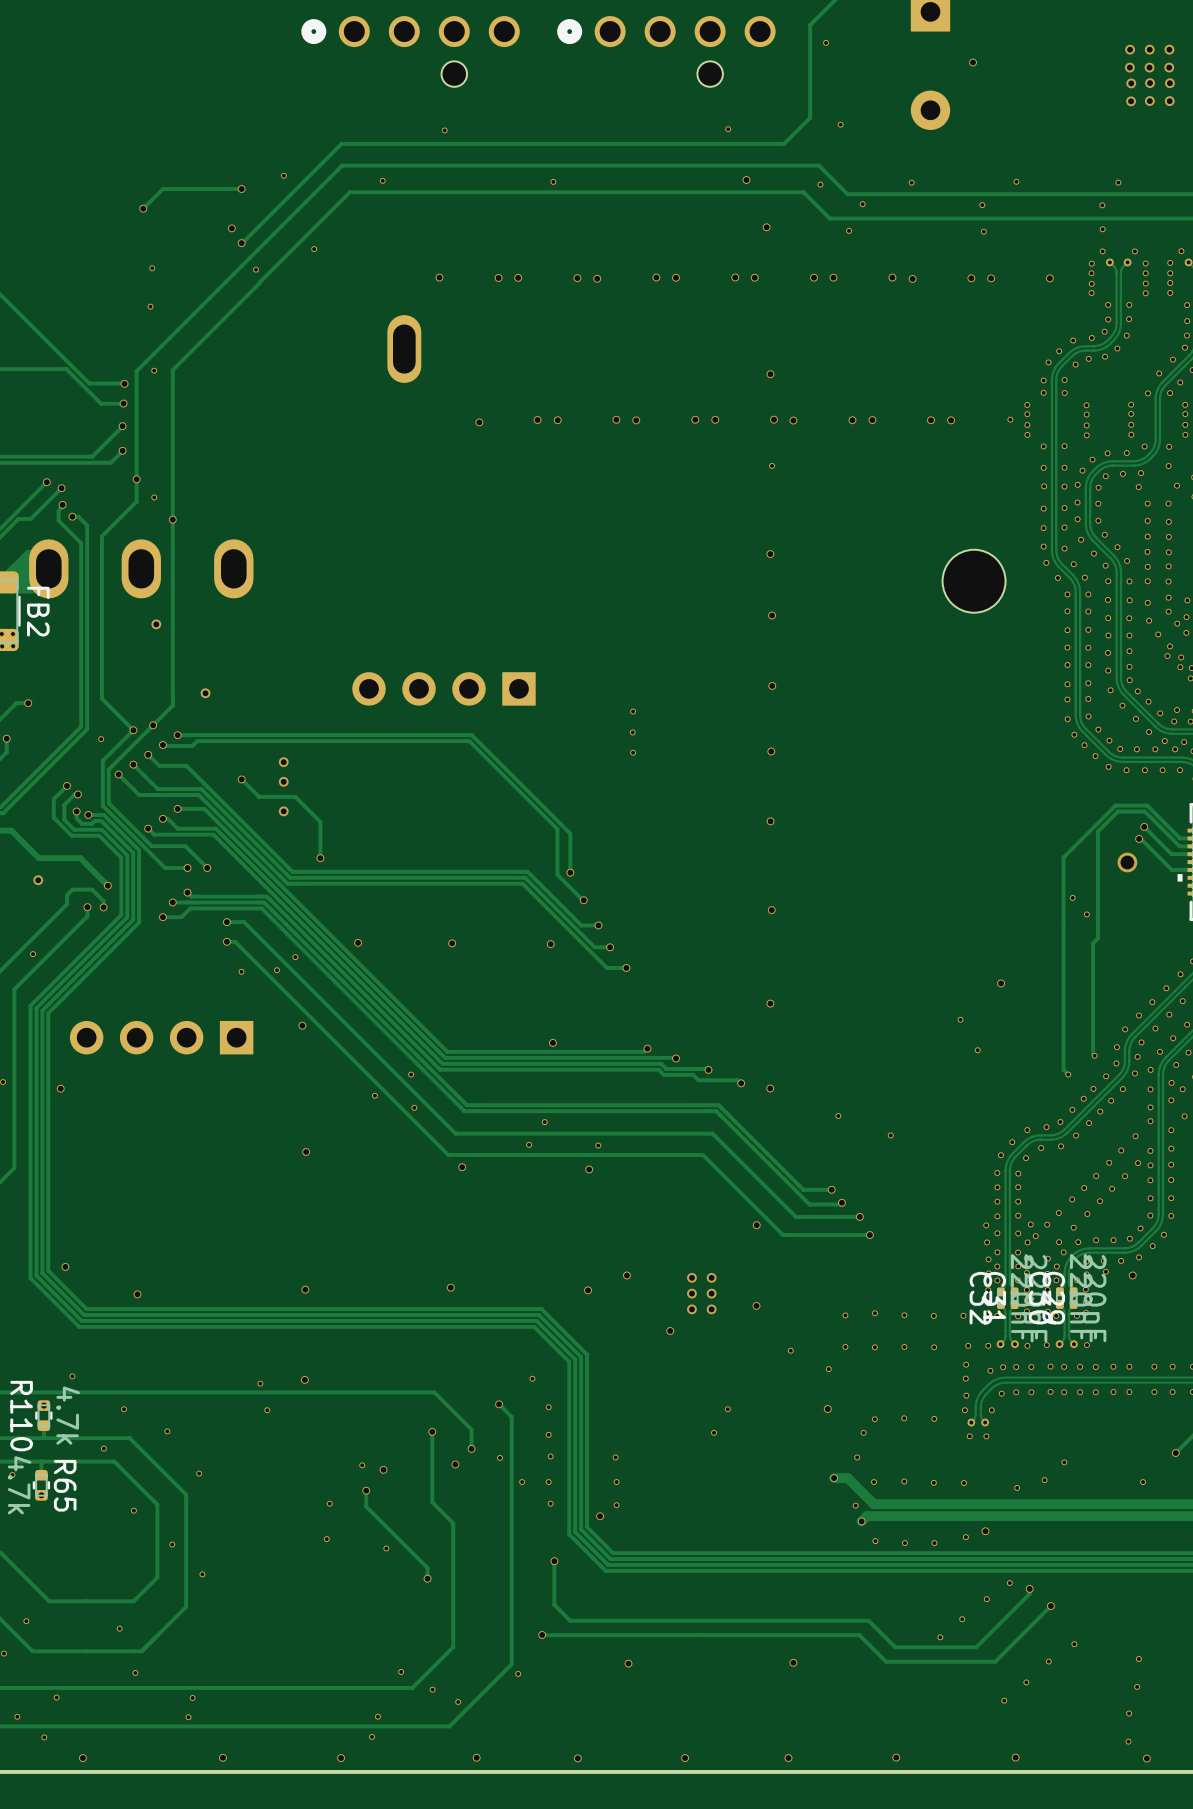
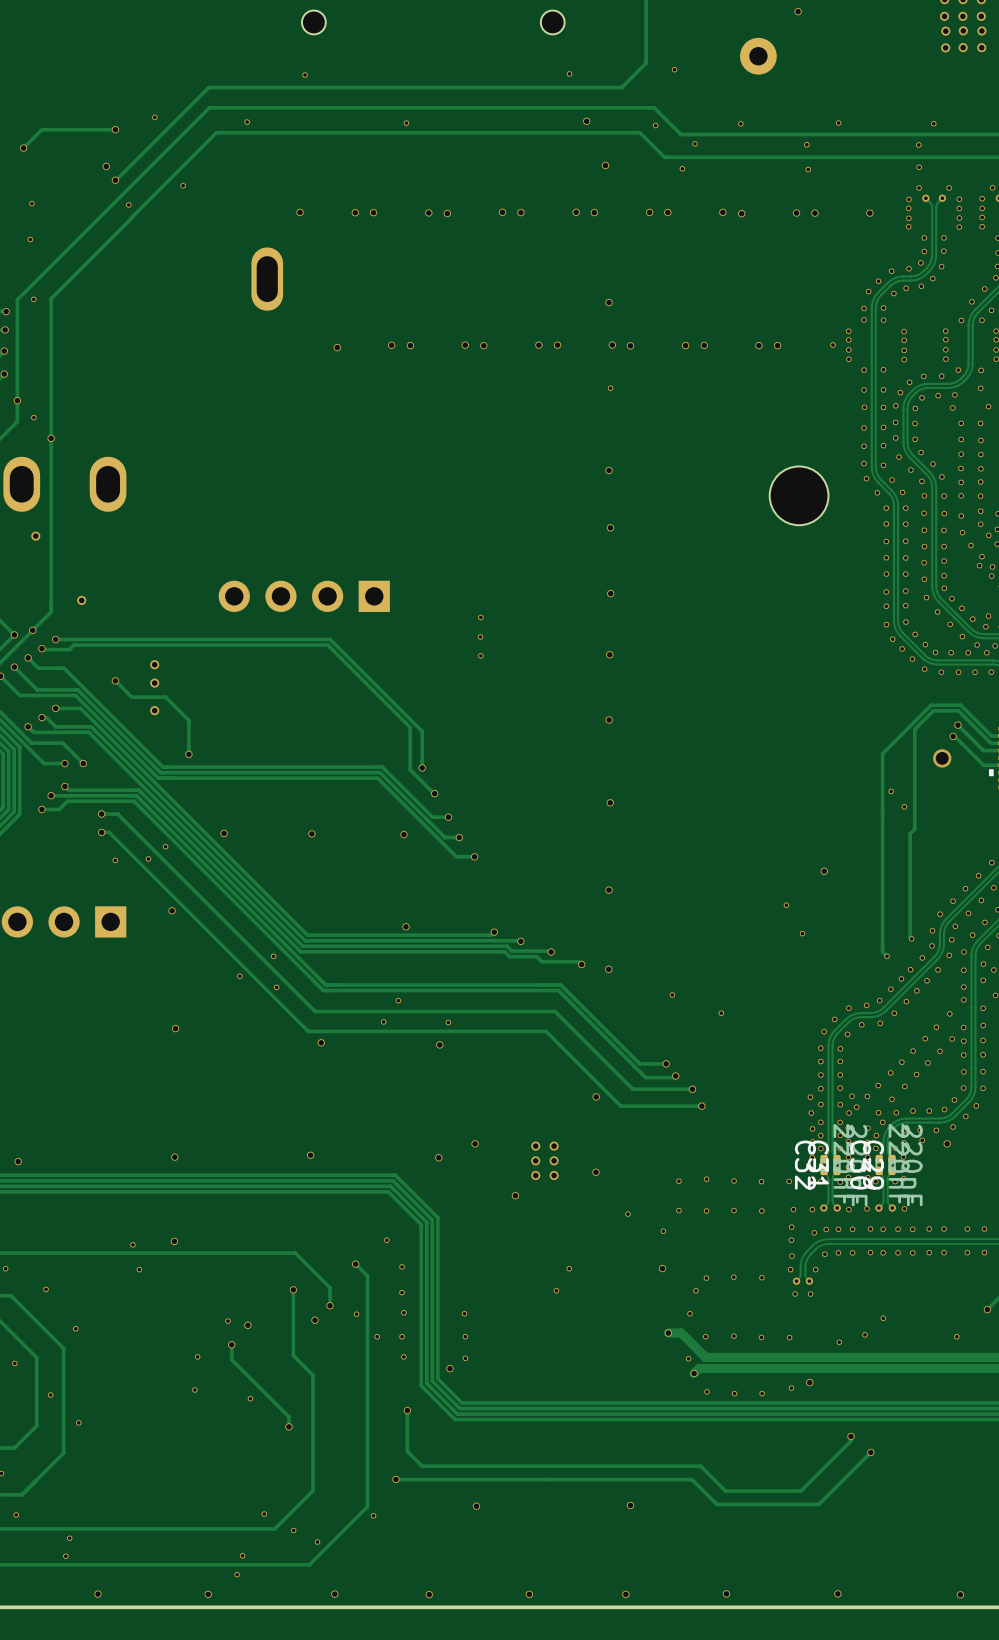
via: (1009, 1583) -> none
via: (986, 1599) -> none
via: (962, 1619) -> none
via: (940, 1637) -> none
via: (1074, 1644) -> none
via: (1138, 1658) -> none
via: (1048, 1661) -> none
via: (1026, 1682) -> none
via: (1137, 1686) -> none
via: (1004, 1700) -> none
via: (1129, 1713) -> none
via: (1128, 1741) -> none

